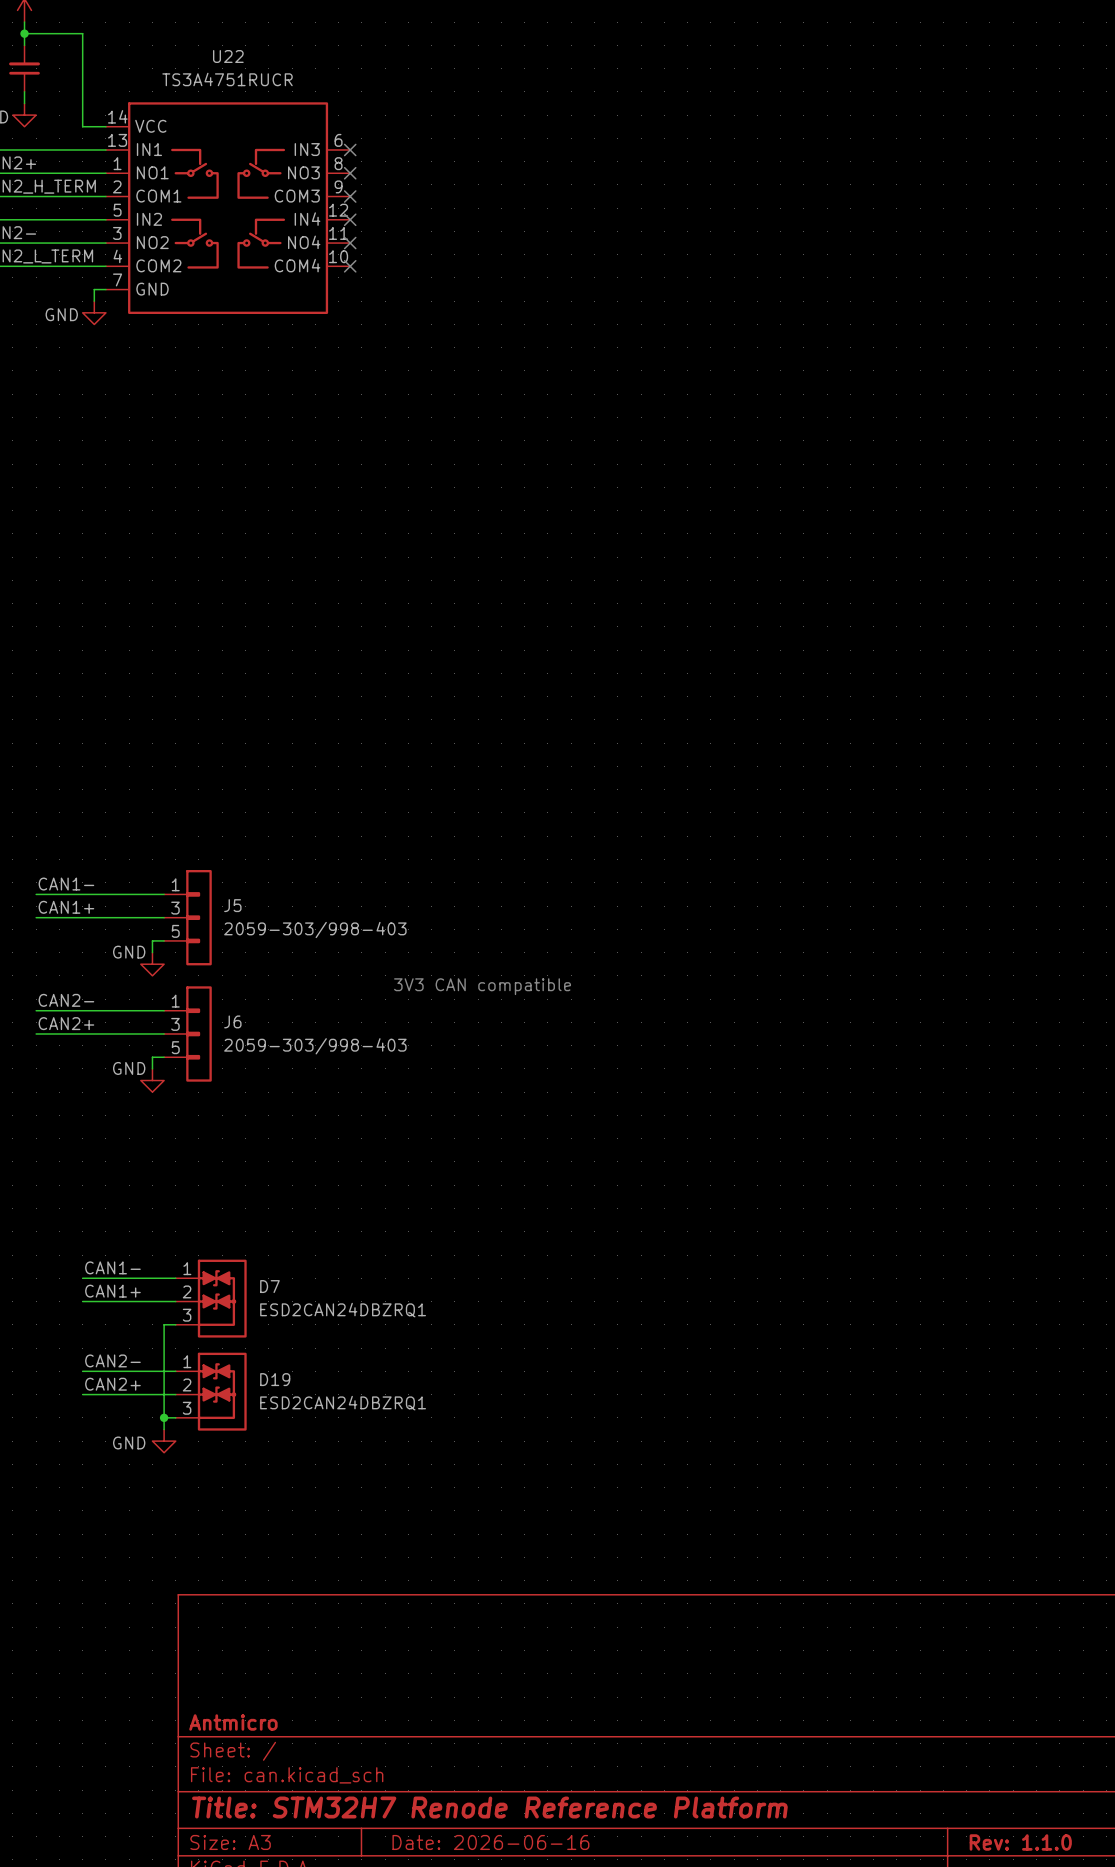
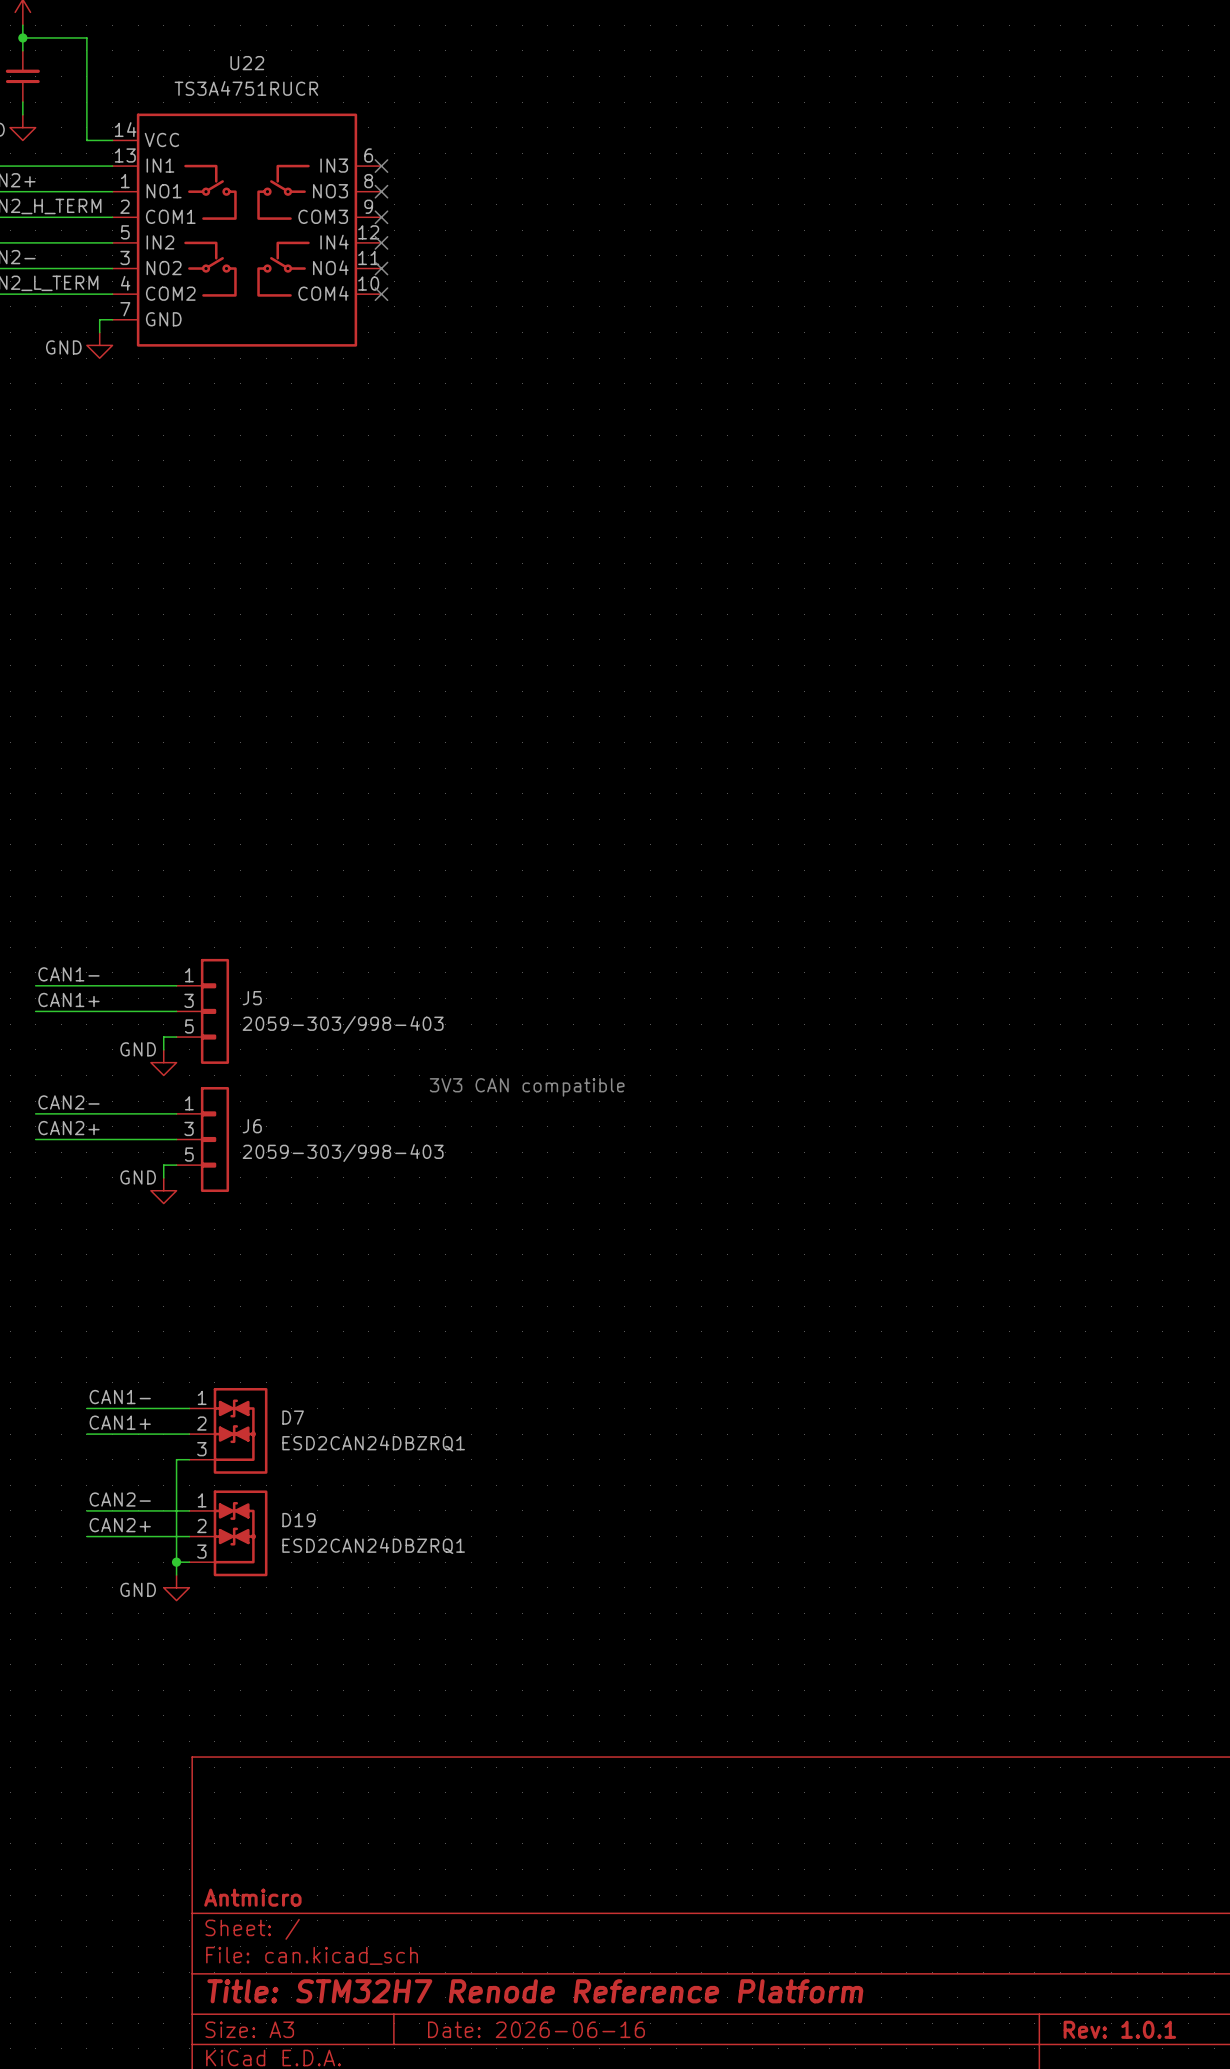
title block: Rev: 1.1.0 (1020, 1842) -> Rev: 1.0.1 (1119, 2029)

